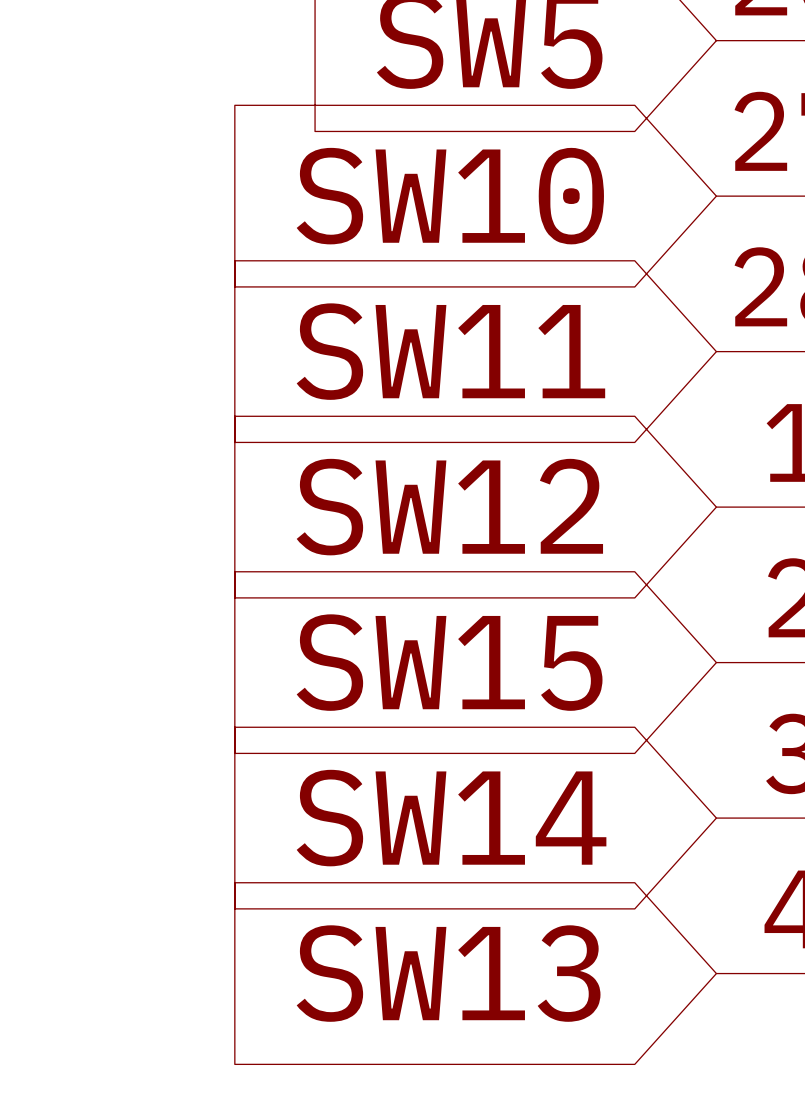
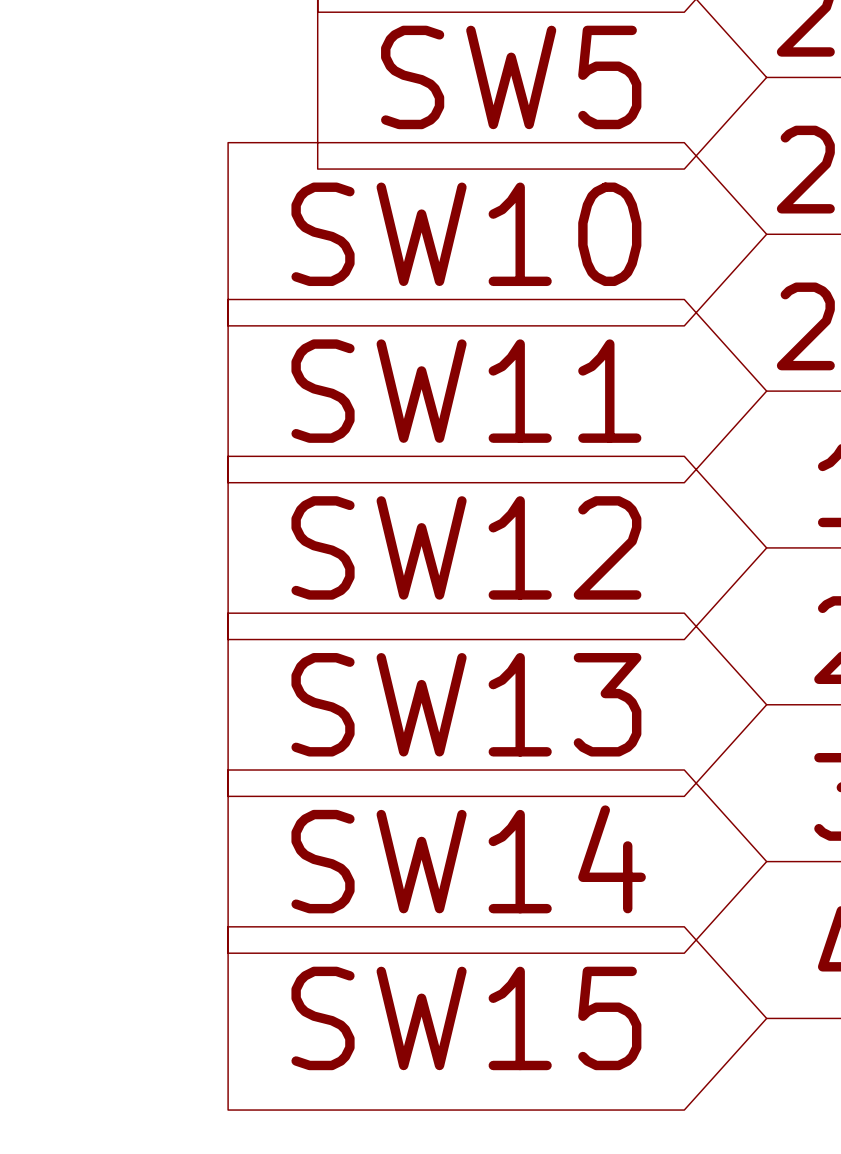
global label: SW15 (449, 662) -> SW13 (466, 704)
global label: SW13 (448, 973) -> SW15 (466, 1018)

